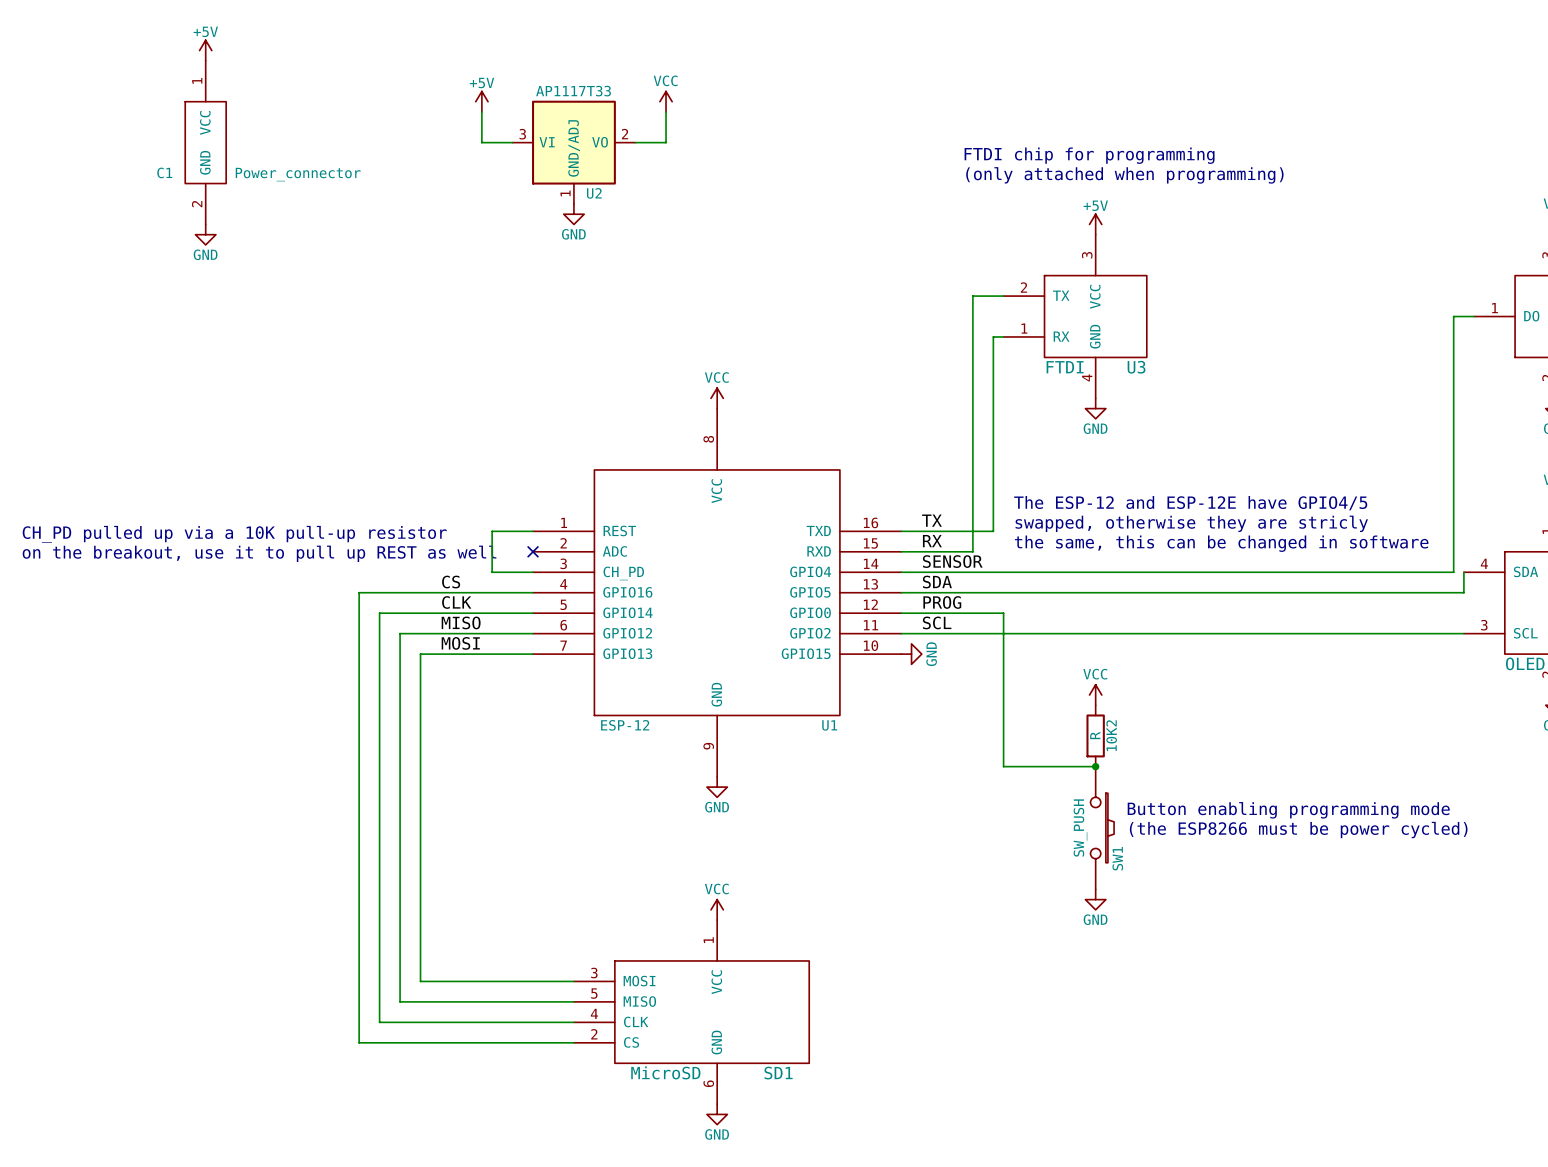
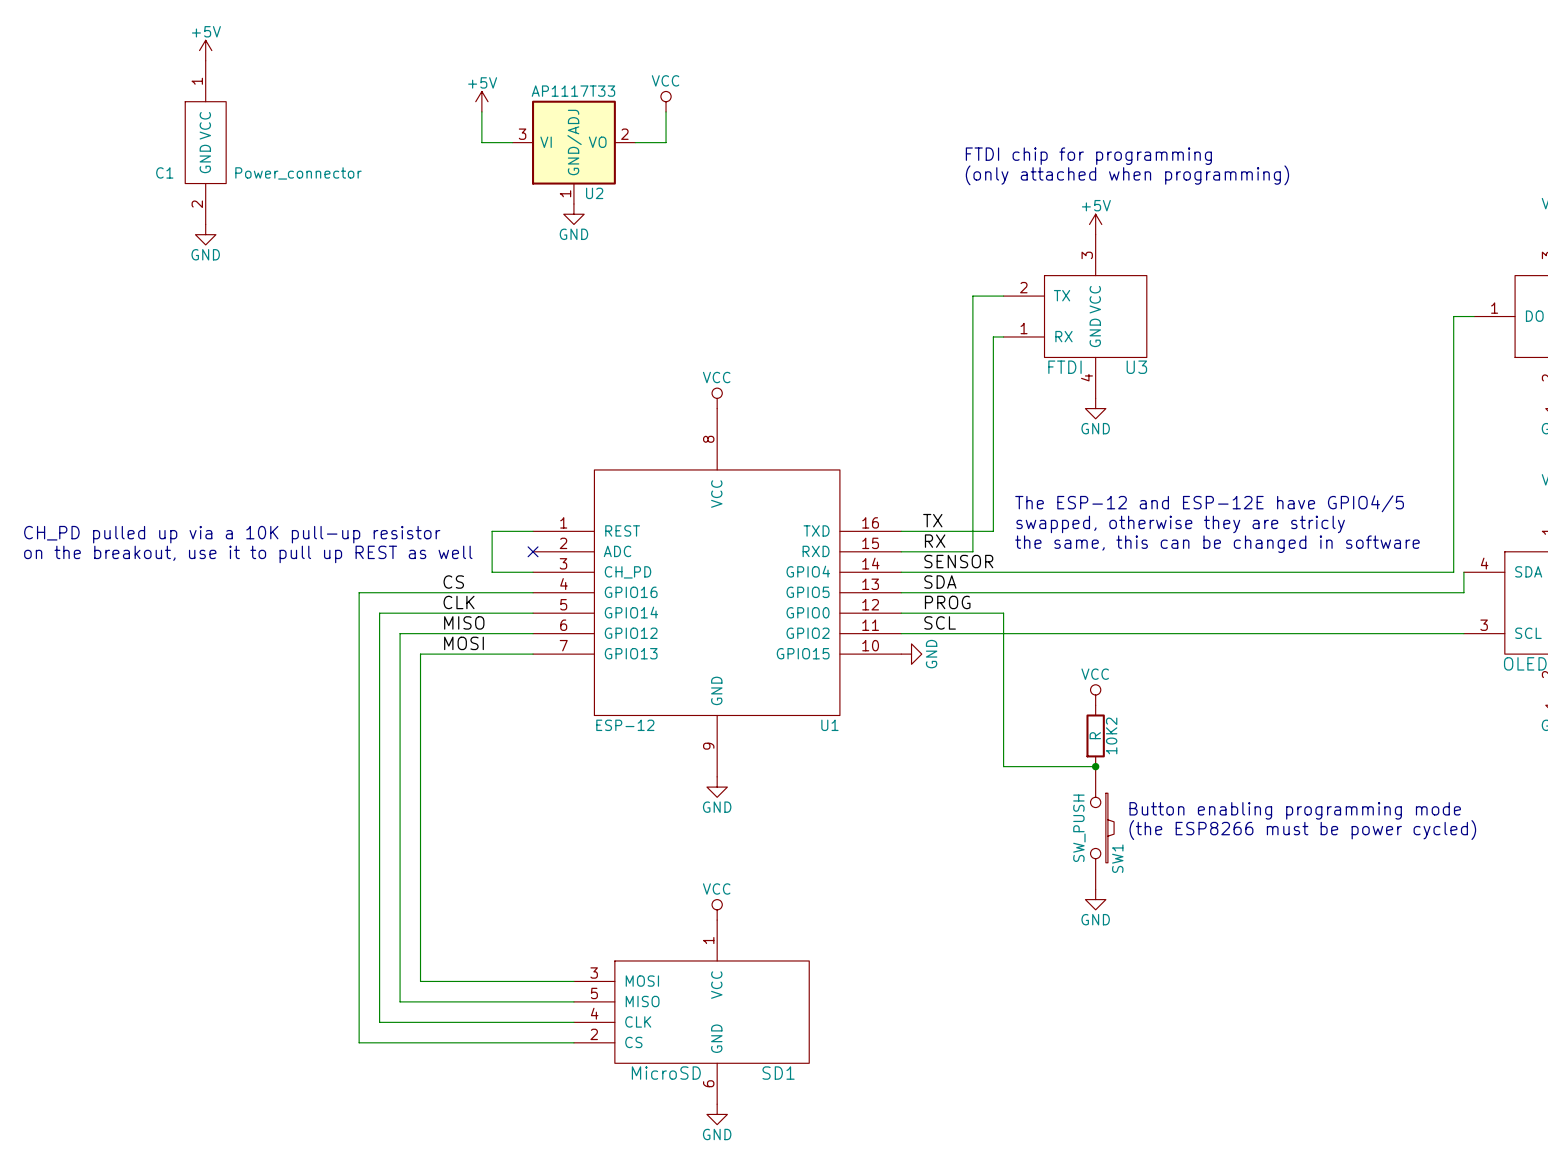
power symbol shape: [659, 91, 673, 112] -> [660, 91, 672, 112]
power symbol shape: [711, 388, 724, 409] -> [712, 388, 723, 409]
power symbol shape: [1089, 684, 1102, 706] -> [1090, 684, 1101, 706]
power symbol shape: [711, 899, 724, 921] -> [712, 899, 723, 921]

